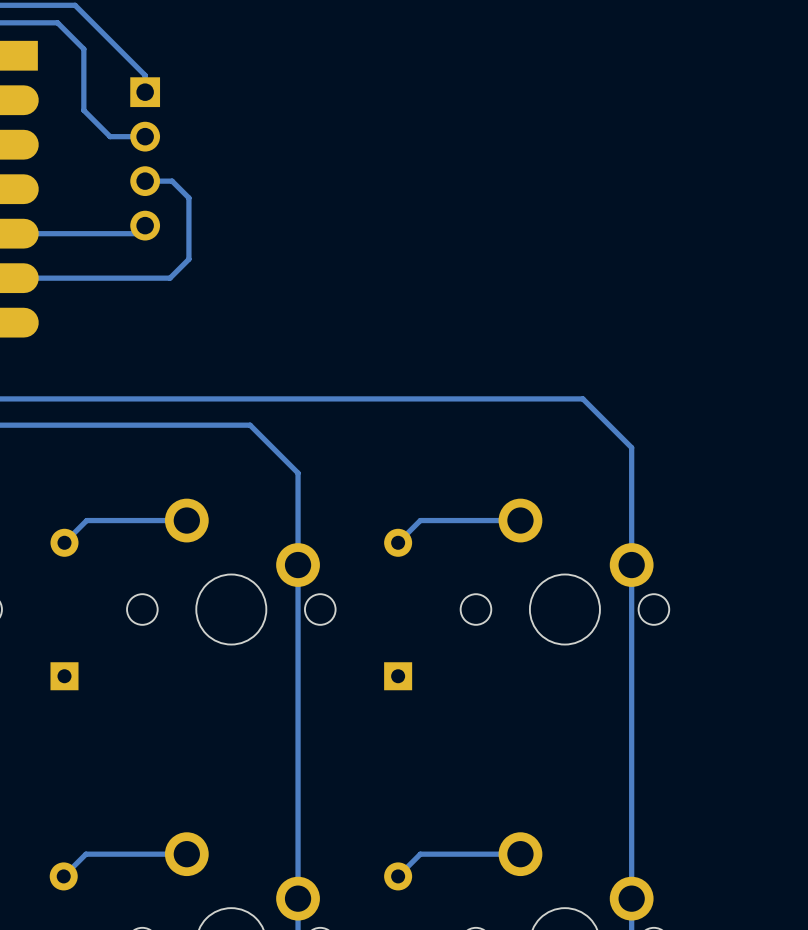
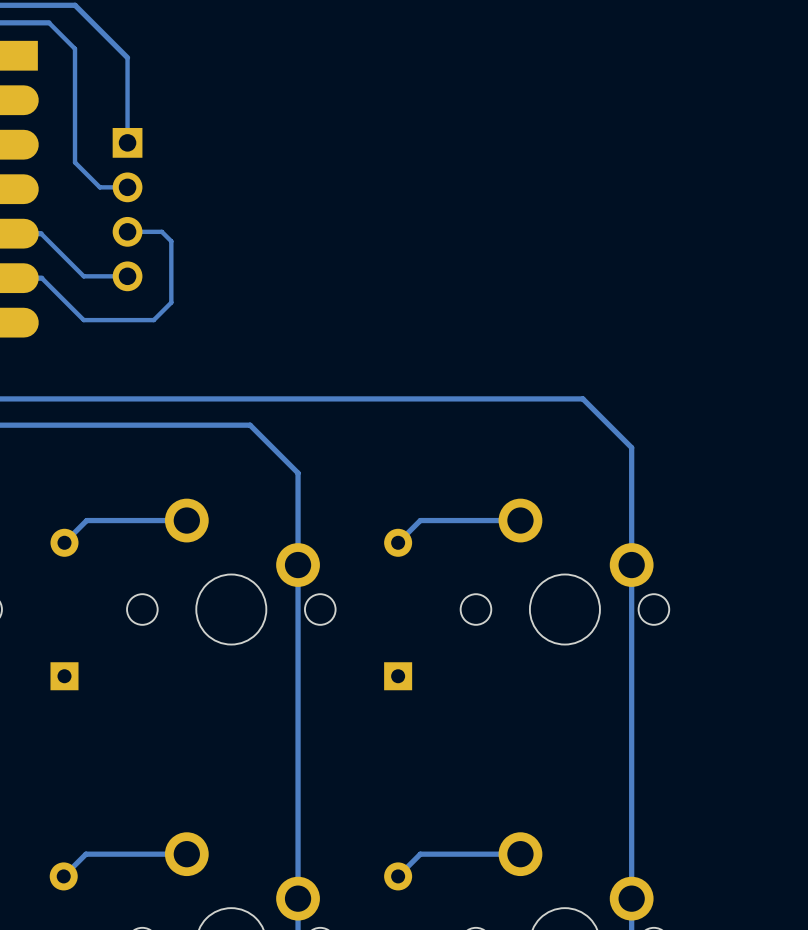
track: (49, 22) (57, 22) (83, 49) (83, 110) (110, 136) (145, 136) -> (49, 22) (75, 48) (75, 162) (99, 187) (127, 187)
track: (127, 57) (145, 75) (145, 92) -> (127, 57) (127, 142)
part position: (145, 158) -> (127, 209)
track: (145, 181) (172, 181) (188, 197) (188, 259) (170, 278) (41, 278) -> (130, 234) (127, 231) (161, 231) (171, 241) (171, 302) (153, 320) (83, 320) (41, 278)
track: (145, 225) (137, 233) (41, 233) -> (127, 276) (83, 276) (41, 233)

